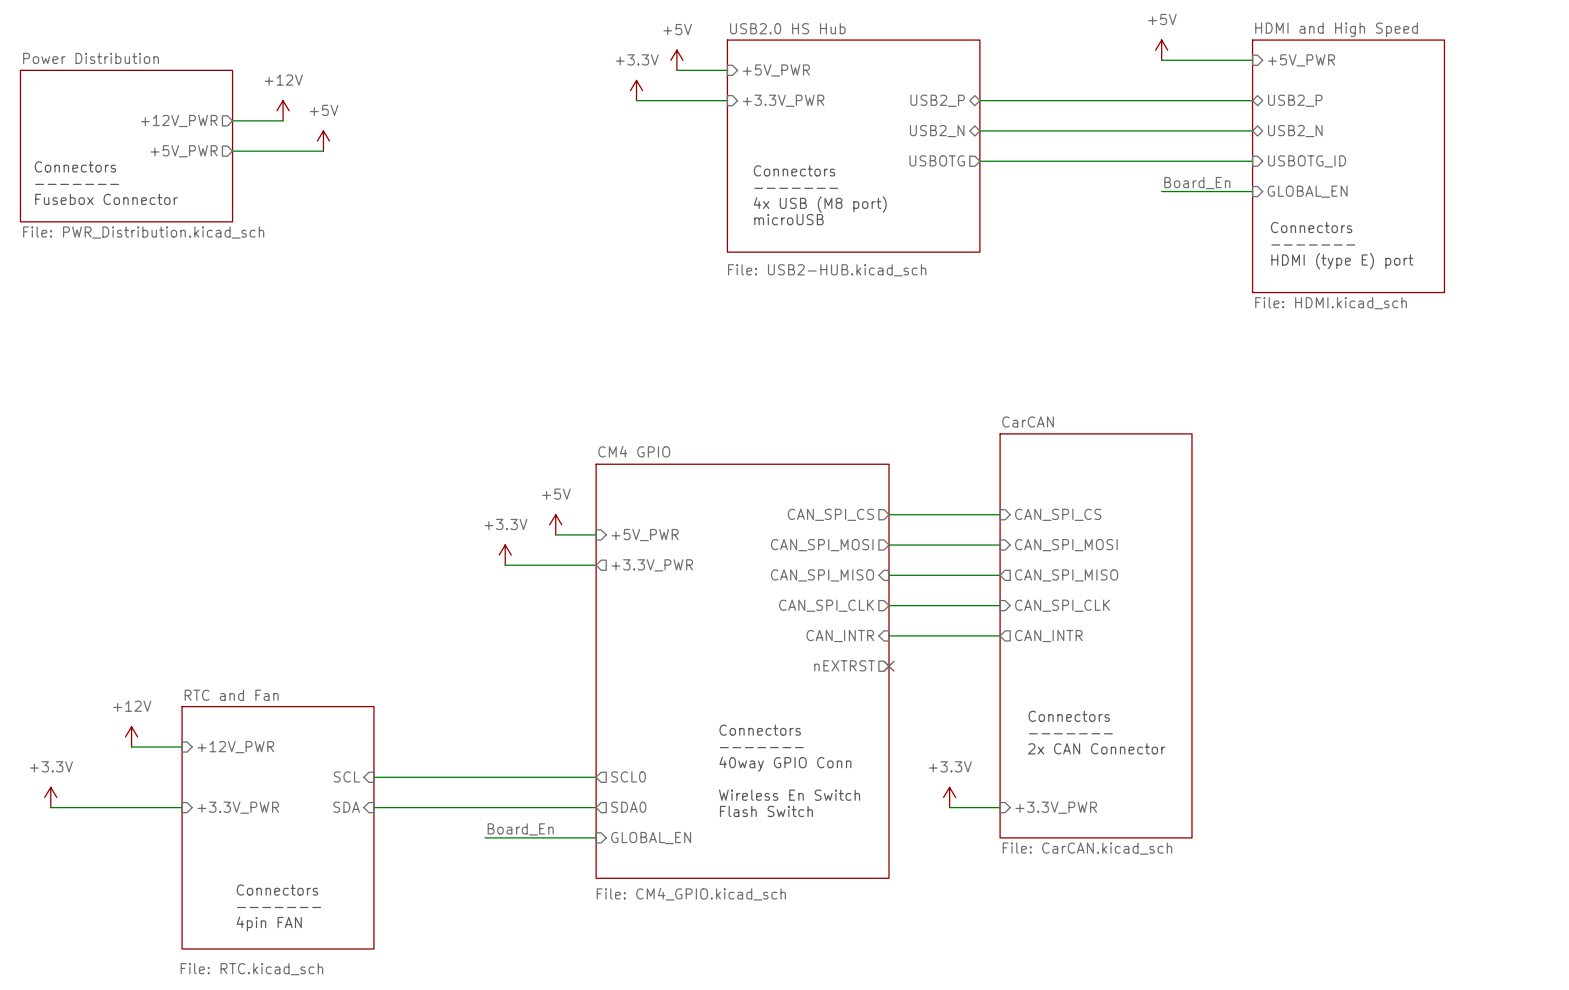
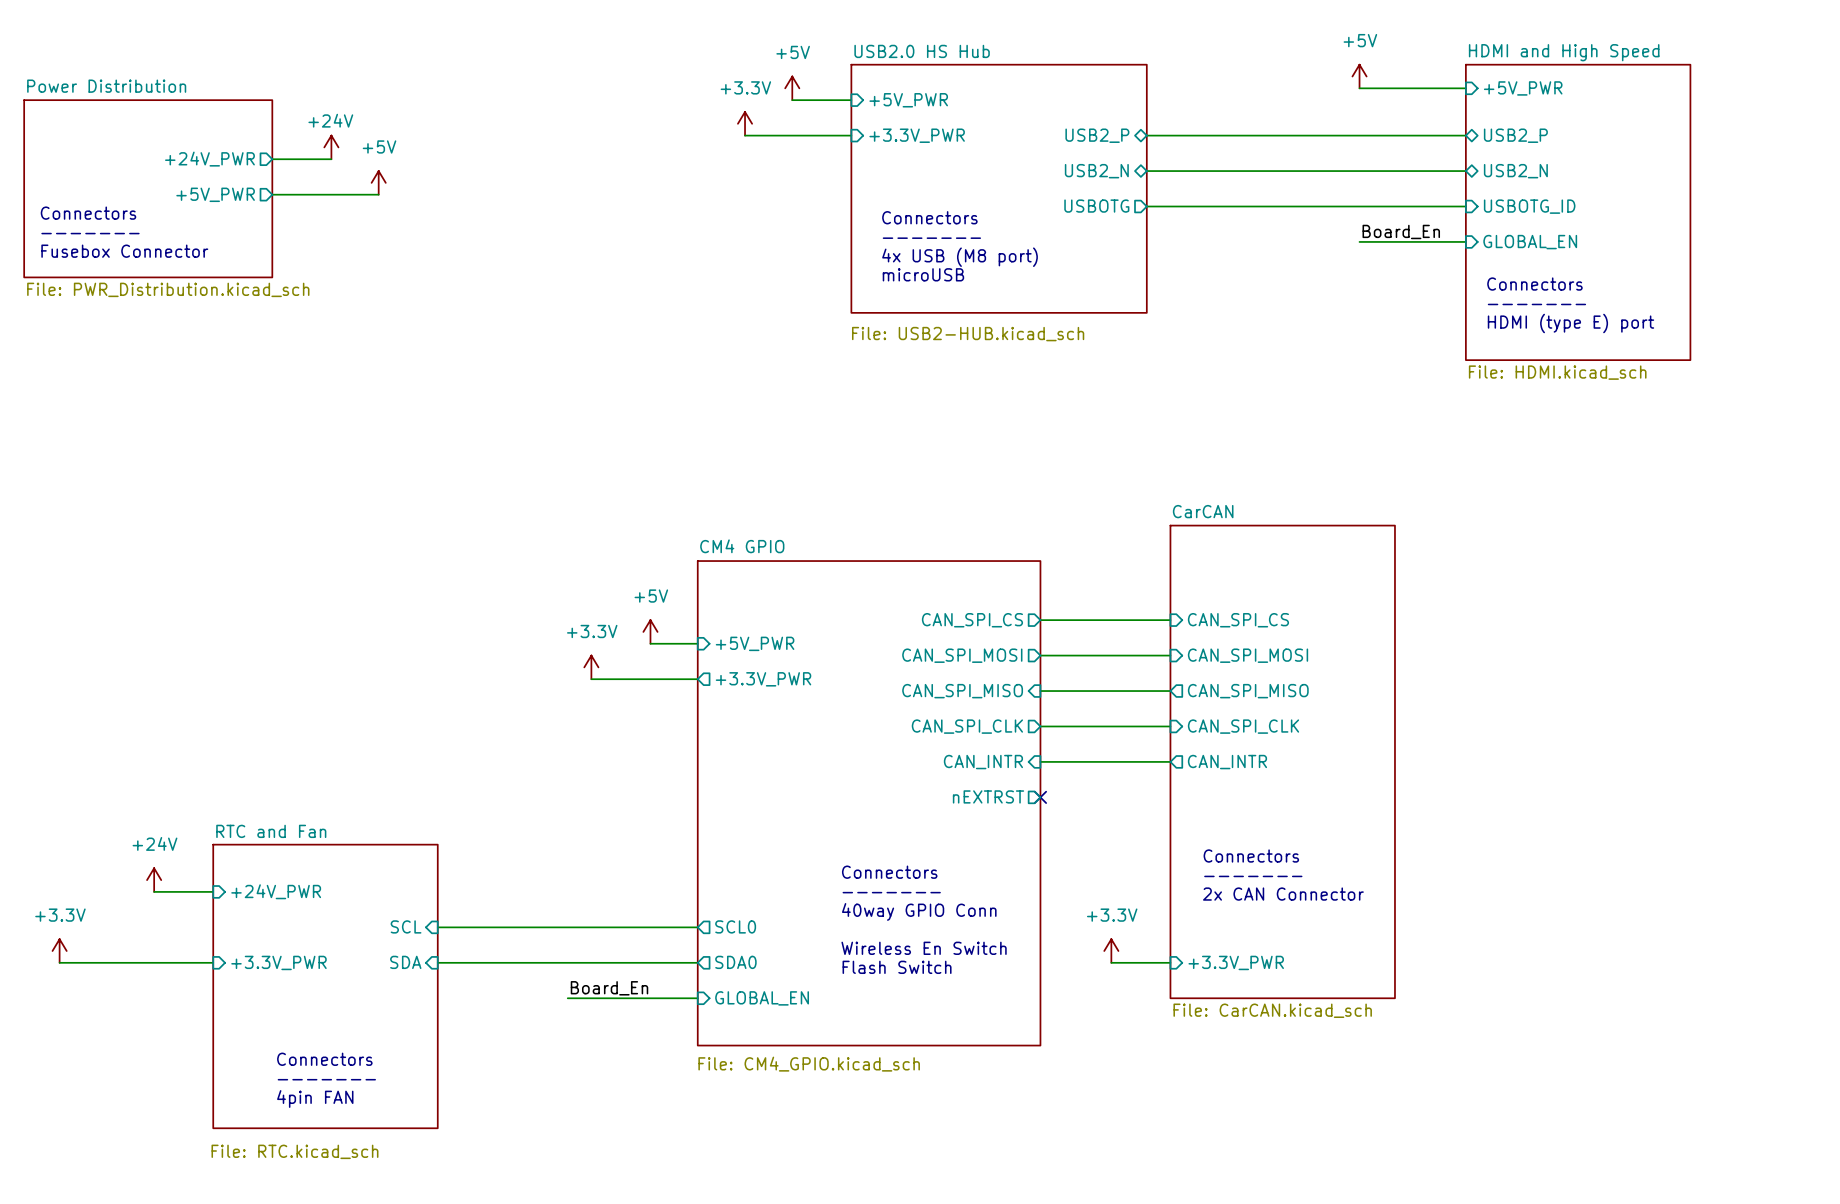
power symbol: +12V (283, 110) -> +24V (331, 147)
sheet pin: +12V_PWR (179, 120) -> +24V_PWR (209, 159)
power symbol: +12V (131, 736) -> +24V (154, 880)
sheet pin: +12V_PWR (235, 747) -> +24V_PWR (276, 891)

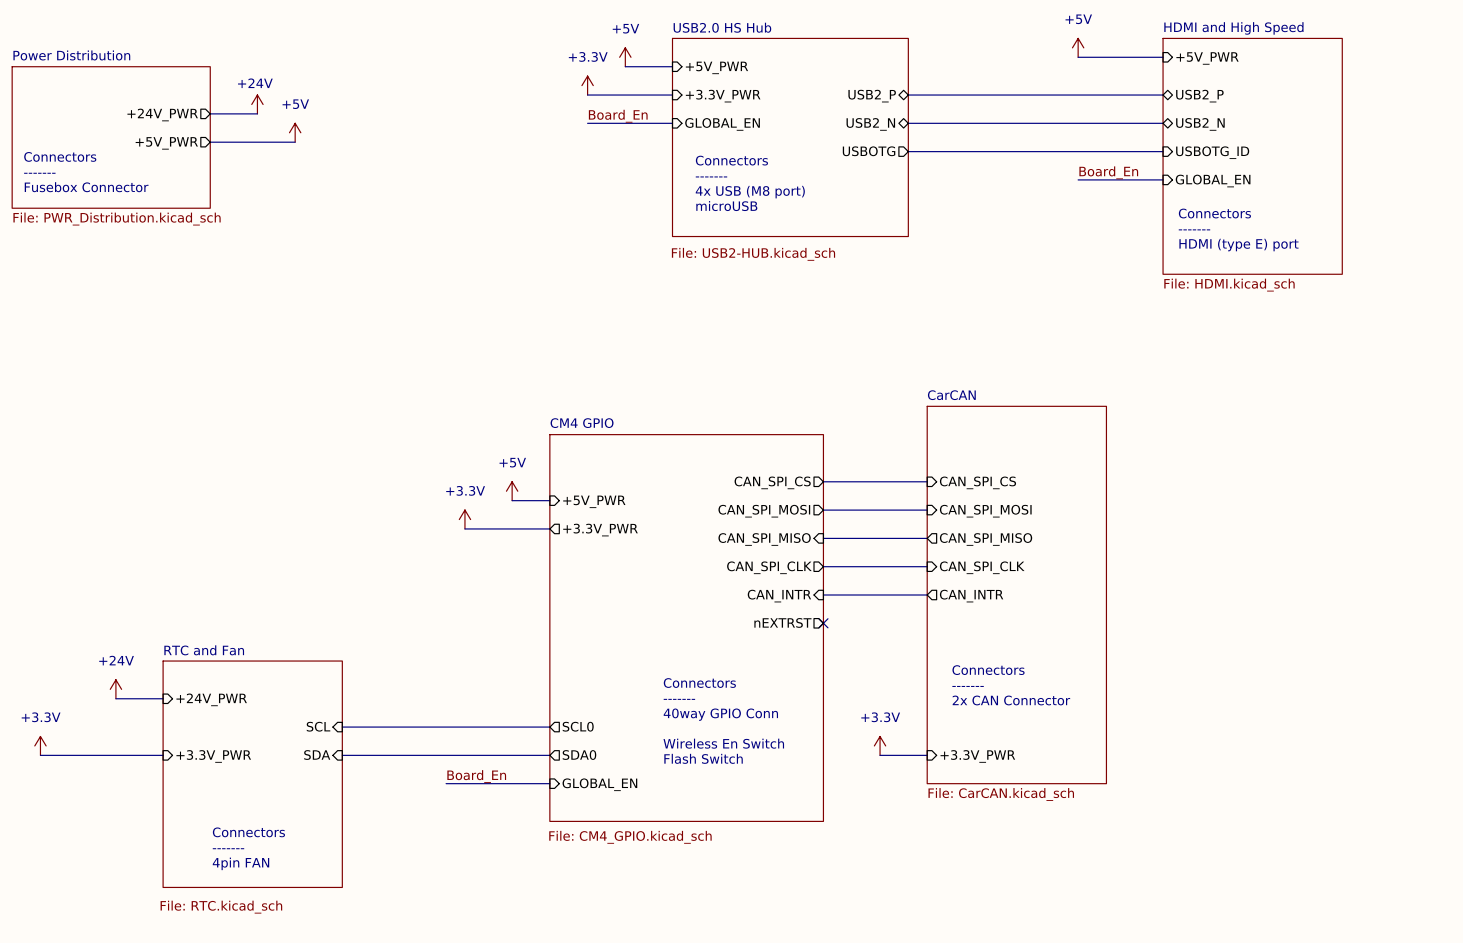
label: none -> Board_En (618, 116)
wire: none -> (587, 123) (672, 123)
sheet pin: none -> GLOBAL_EN (722, 124)

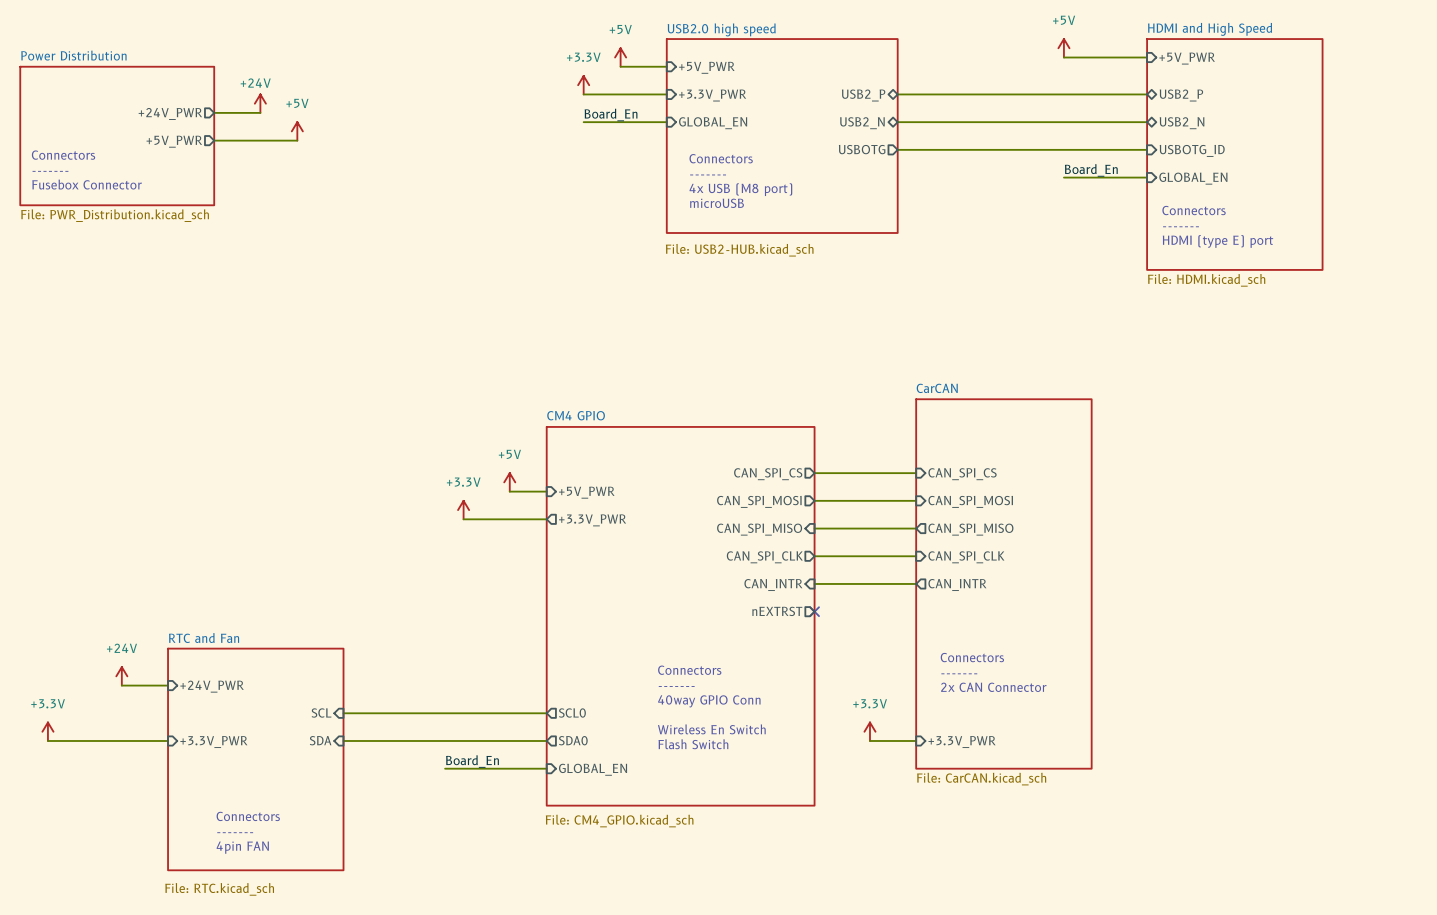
sheet USB2.0 HS Hub name: USB2.0 HS Hub (722, 27) -> USB2.0 high speed (721, 29)

